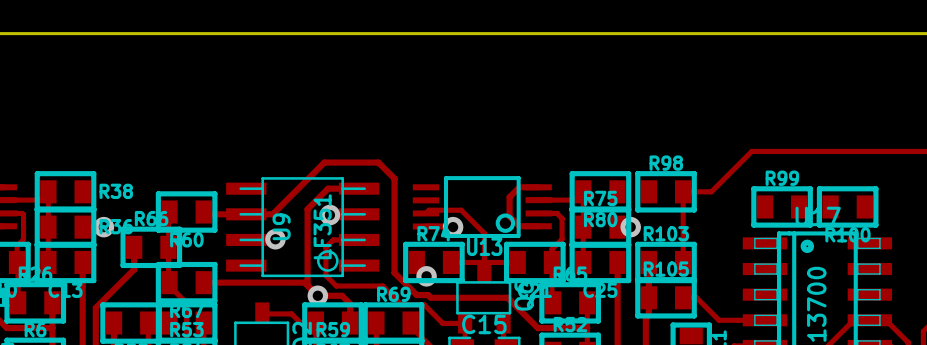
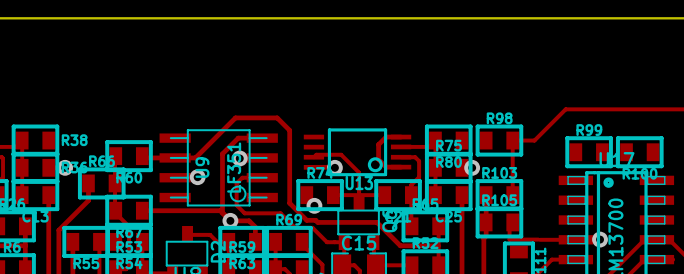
track: (683, 297) (696, 297) (719, 320) -> (512, 222) (509, 225) (509, 239) (538, 239)
via: none -> (600, 239)

